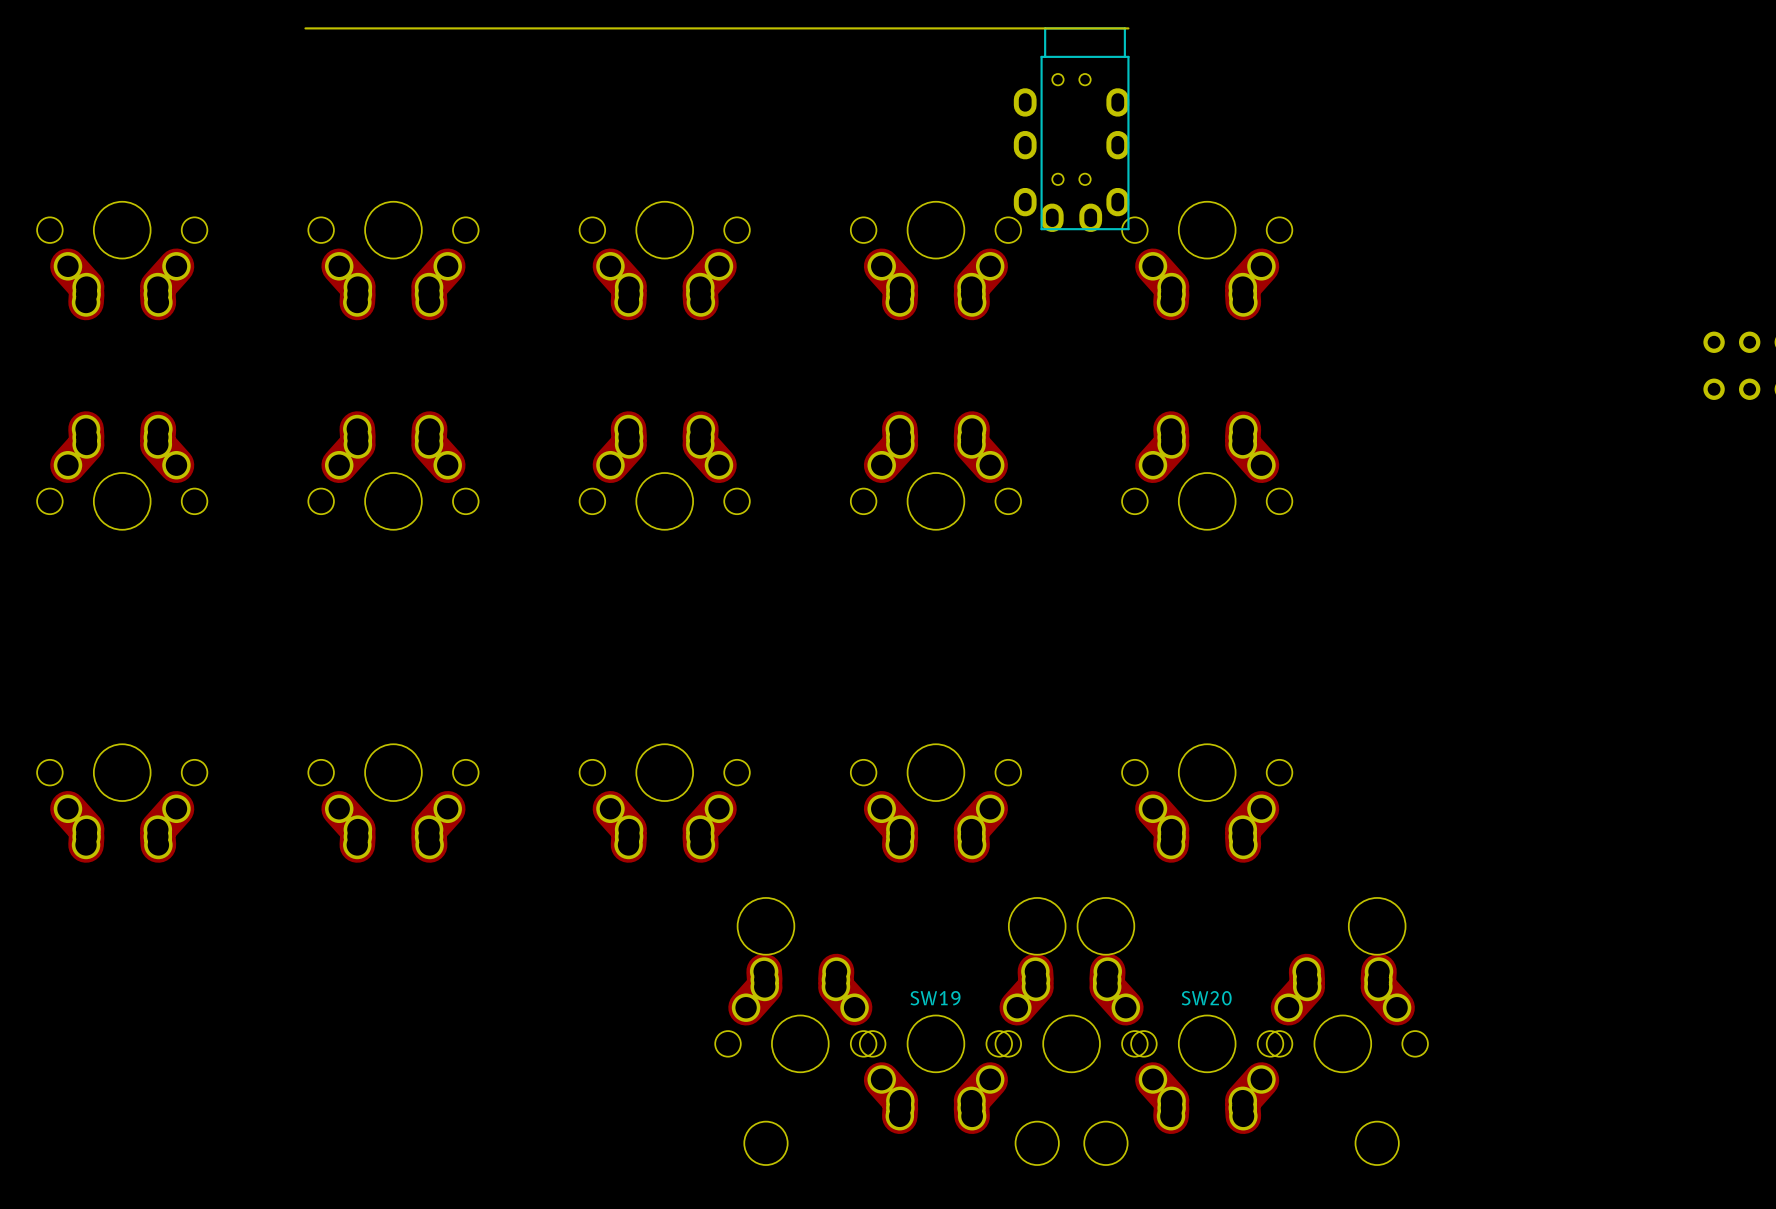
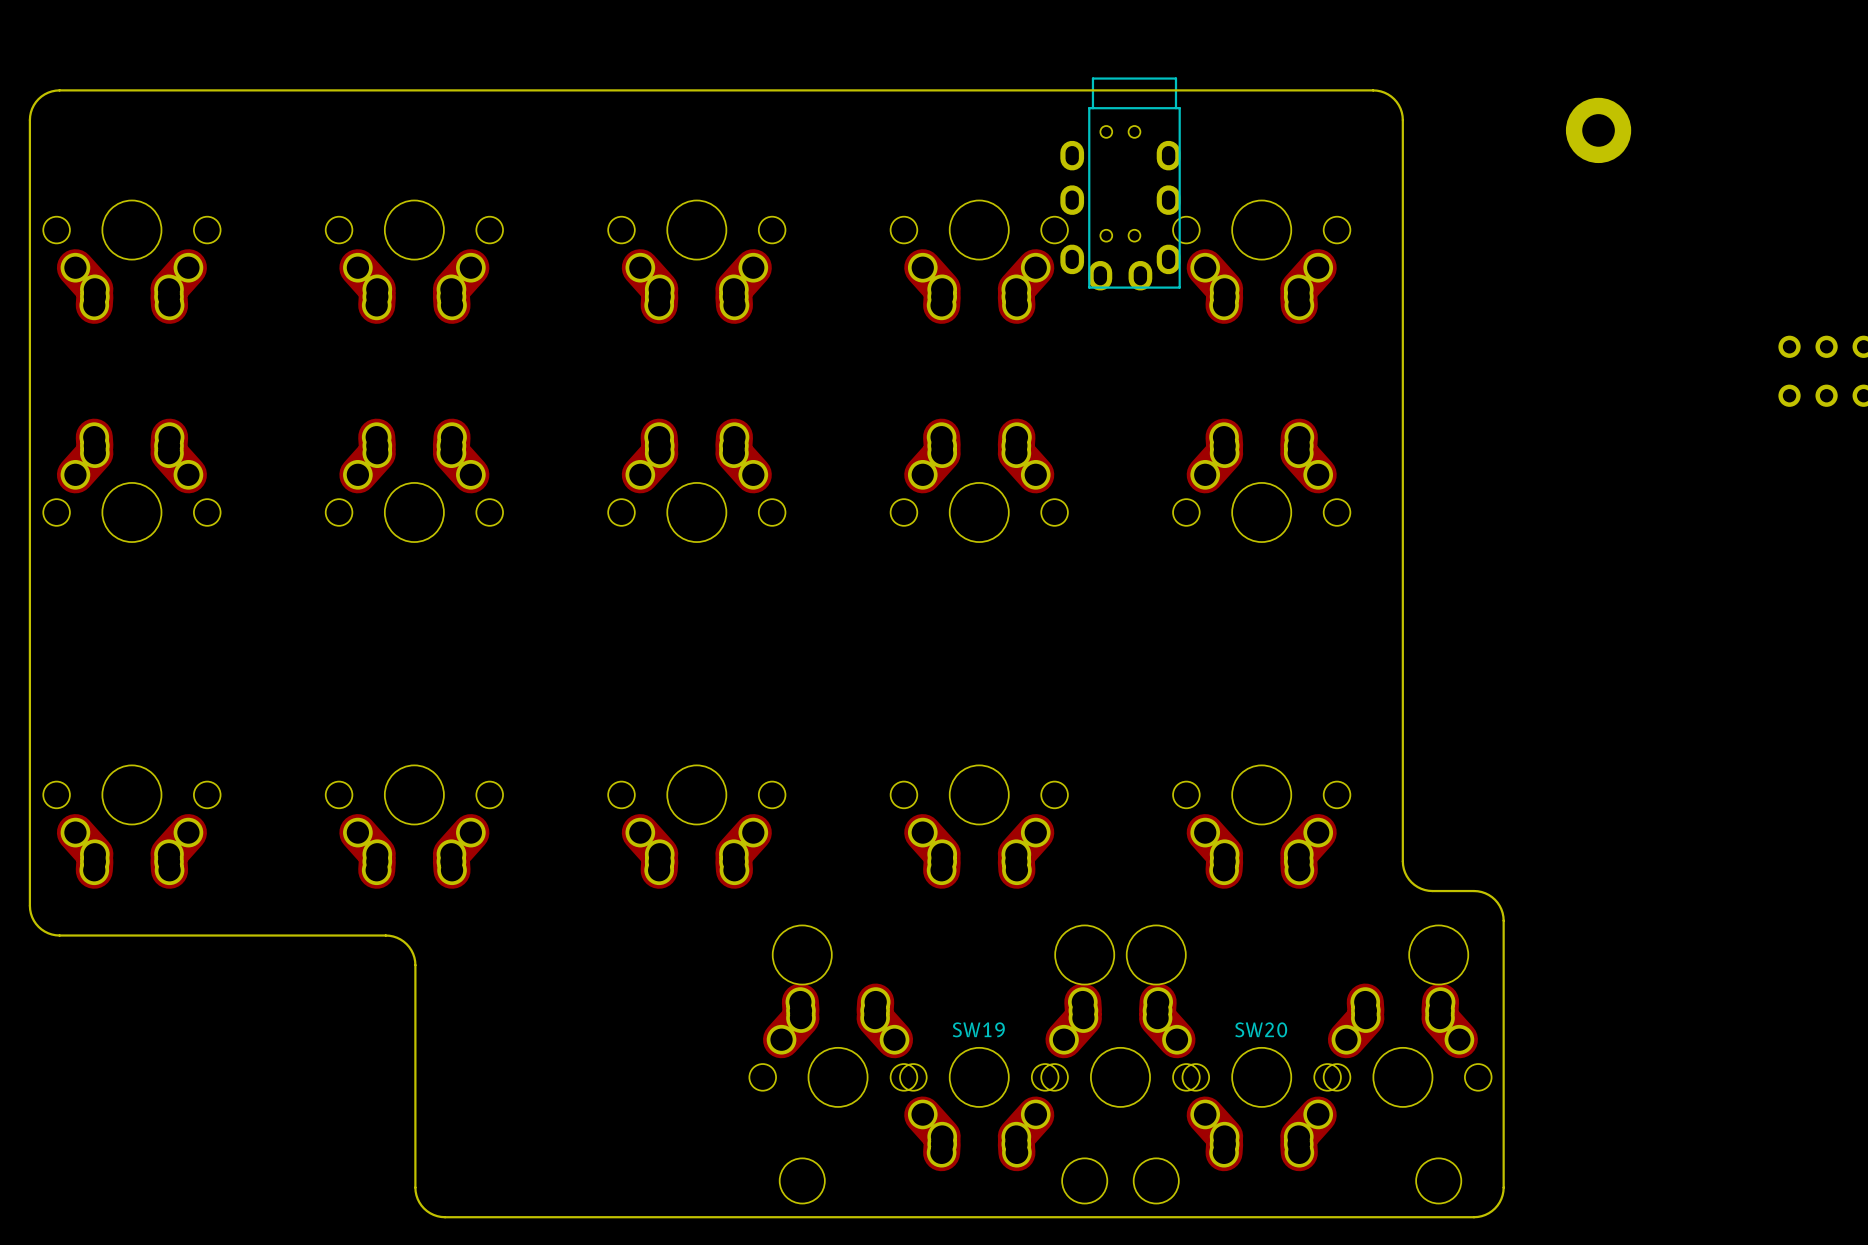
board edge: (305, 28) (1128, 28) -> none
board edge: none -> (59, 90) (1373, 90) (1384, 92) (1391, 96) (1398, 105) (1402, 120) (1403, 865) (1408, 879) (1421, 888) (1432, 891) (1481, 892) (1494, 899) (1502, 913) (1503, 1187) (1501, 1198) (1497, 1205) (1485, 1214) (1474, 1217) (441, 1216) (433, 1214) (424, 1208) (419, 1202) (415, 1191) (415, 965) (413, 953) (403, 941) (397, 937) (385, 935) (59, 935) (48, 933) (41, 929) (32, 917) (29, 905) (29, 120) (32, 108) (38, 99) (48, 92) (59, 90)
part position: (1085, 129) -> (1134, 183)
part: none -> (1598, 130)
part position: (1057, 152) -> (1106, 208)

